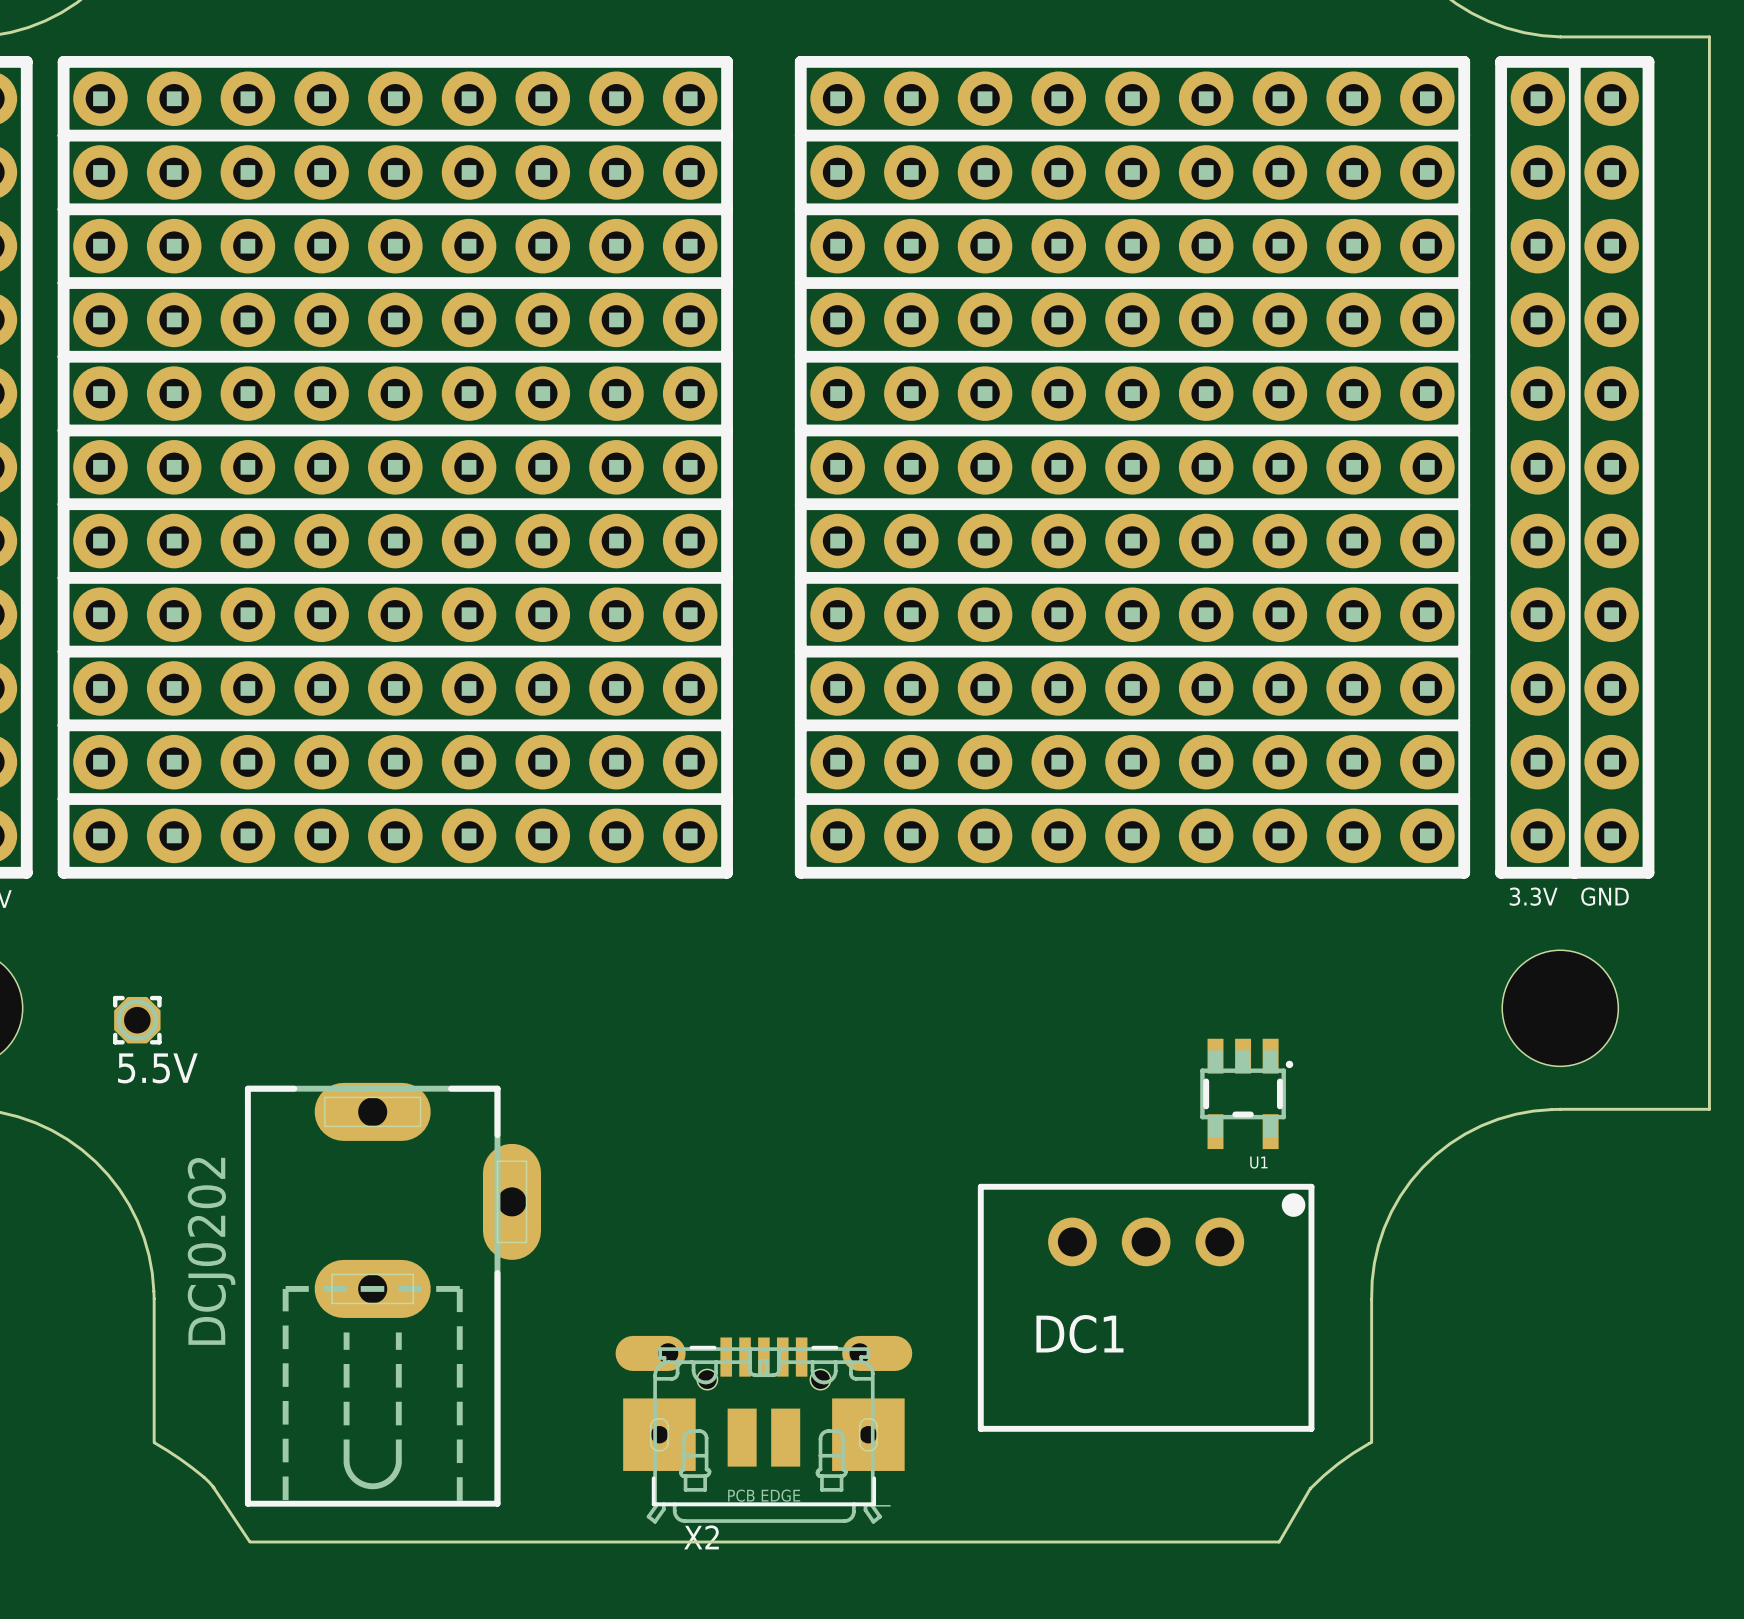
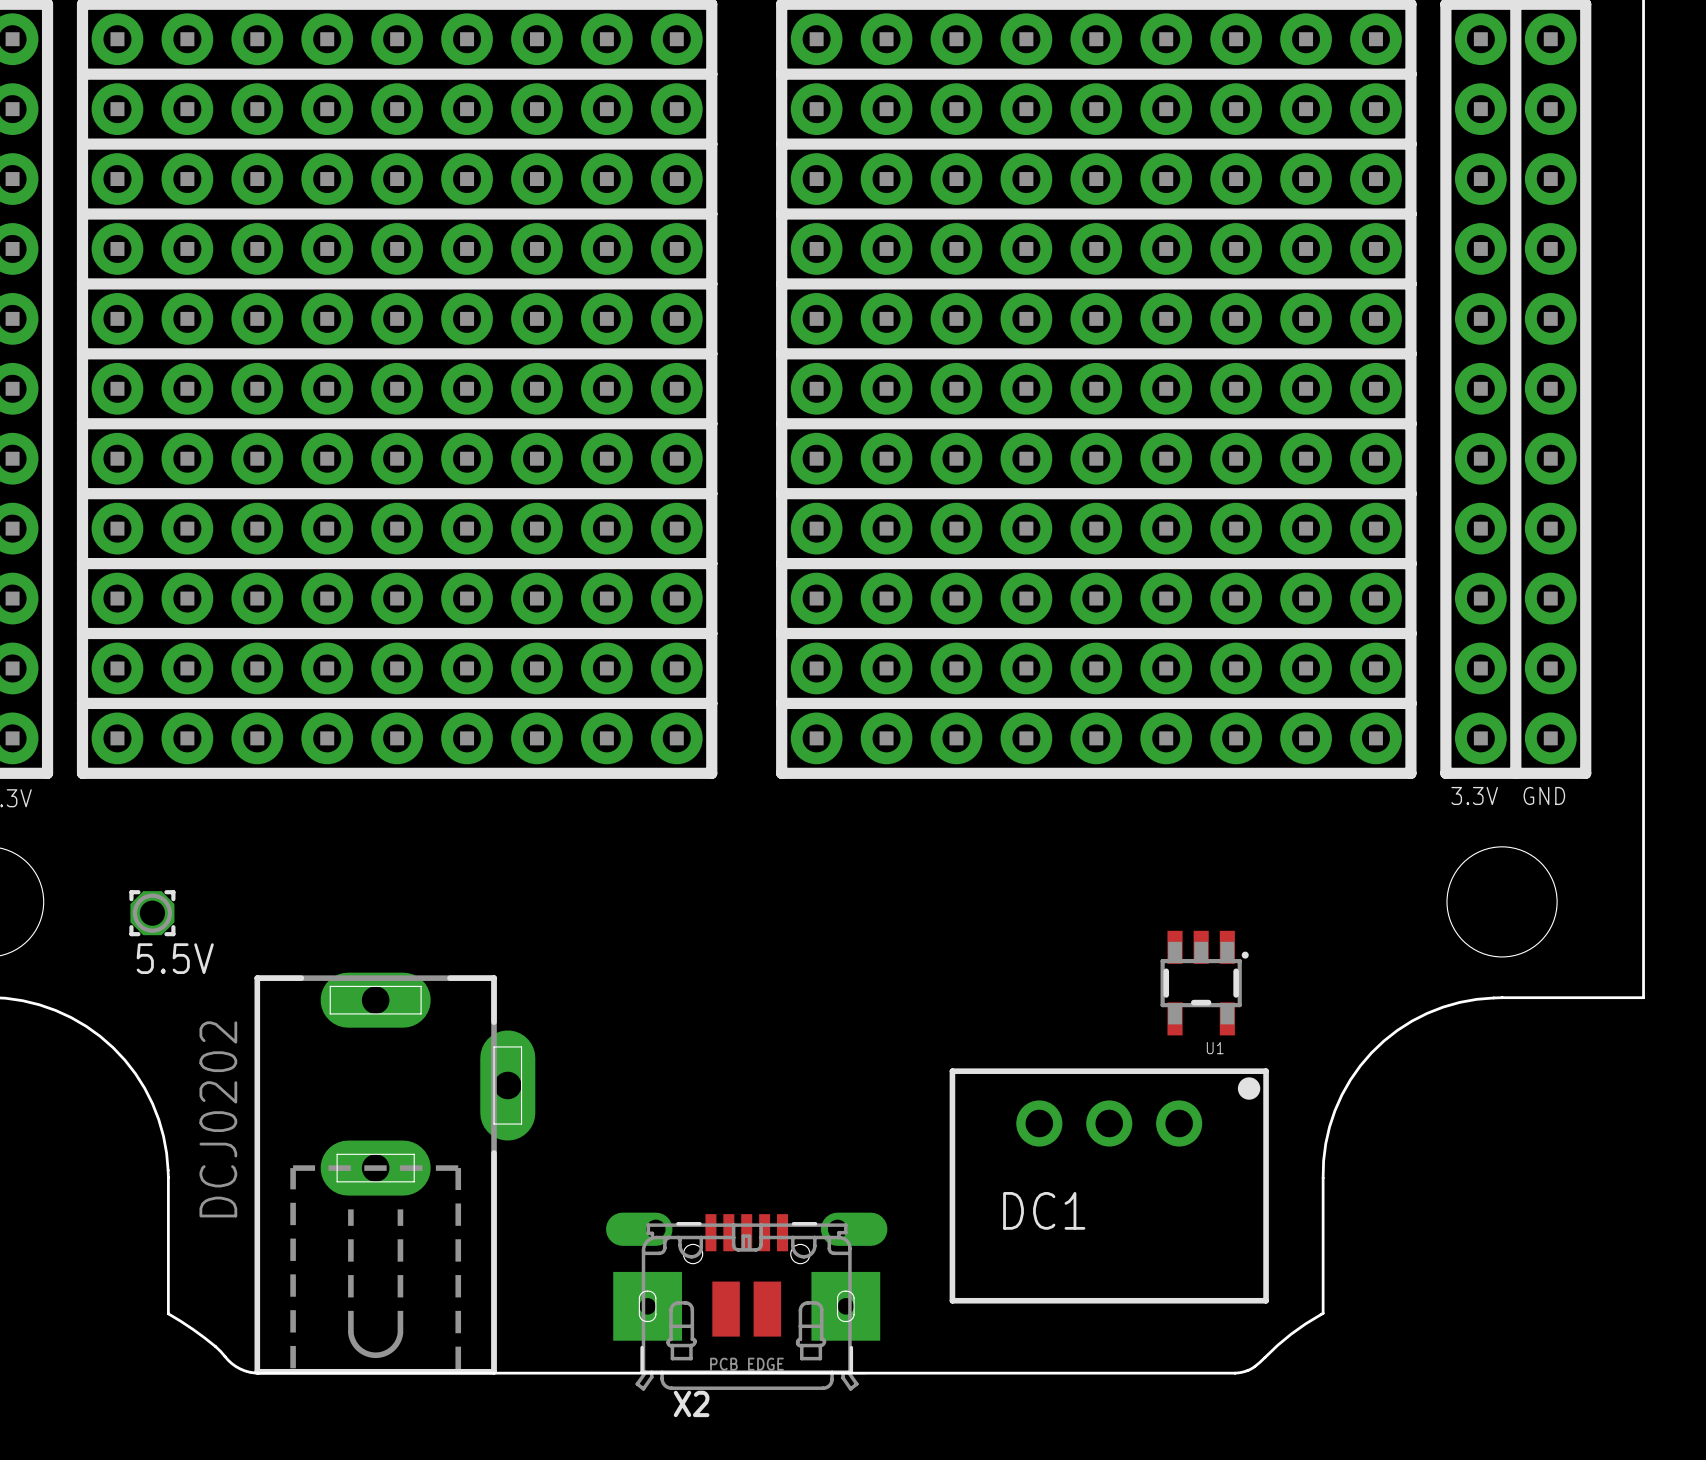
board edge: (212, 1486) (249, 1541) -> none
board edge: (1310, 1488) (1279, 1542) -> (1265, 1357) (1251, 1368) (1235, 1373) (258, 1373) (239, 1368) (225, 1356)
board edge: (250, 1542) (1278, 1542) -> none

